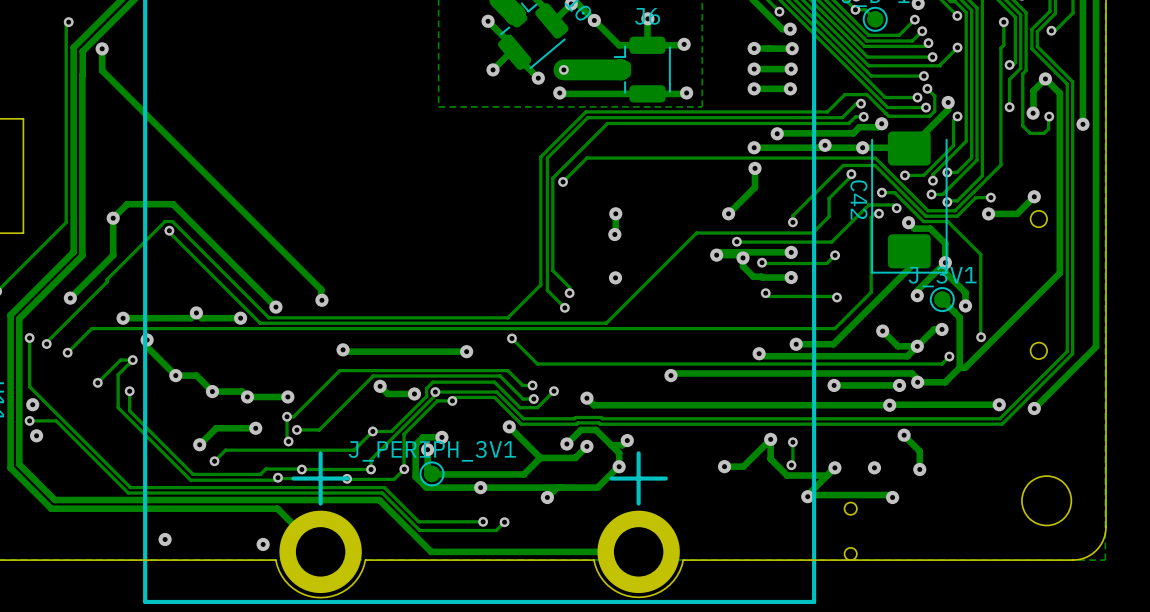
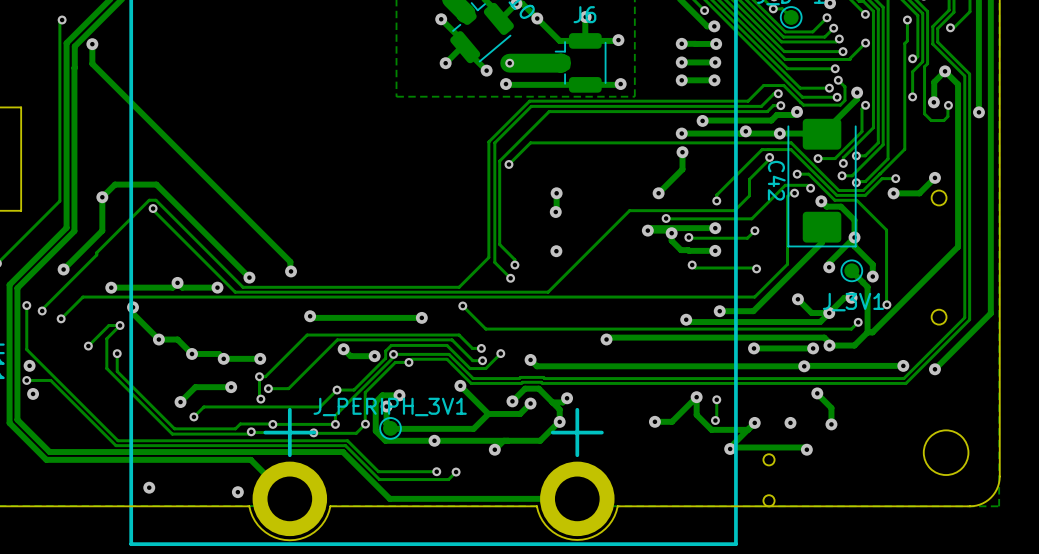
J_3V1 name position: J_3V1 (942, 276) -> J_3V1 (853, 302)

